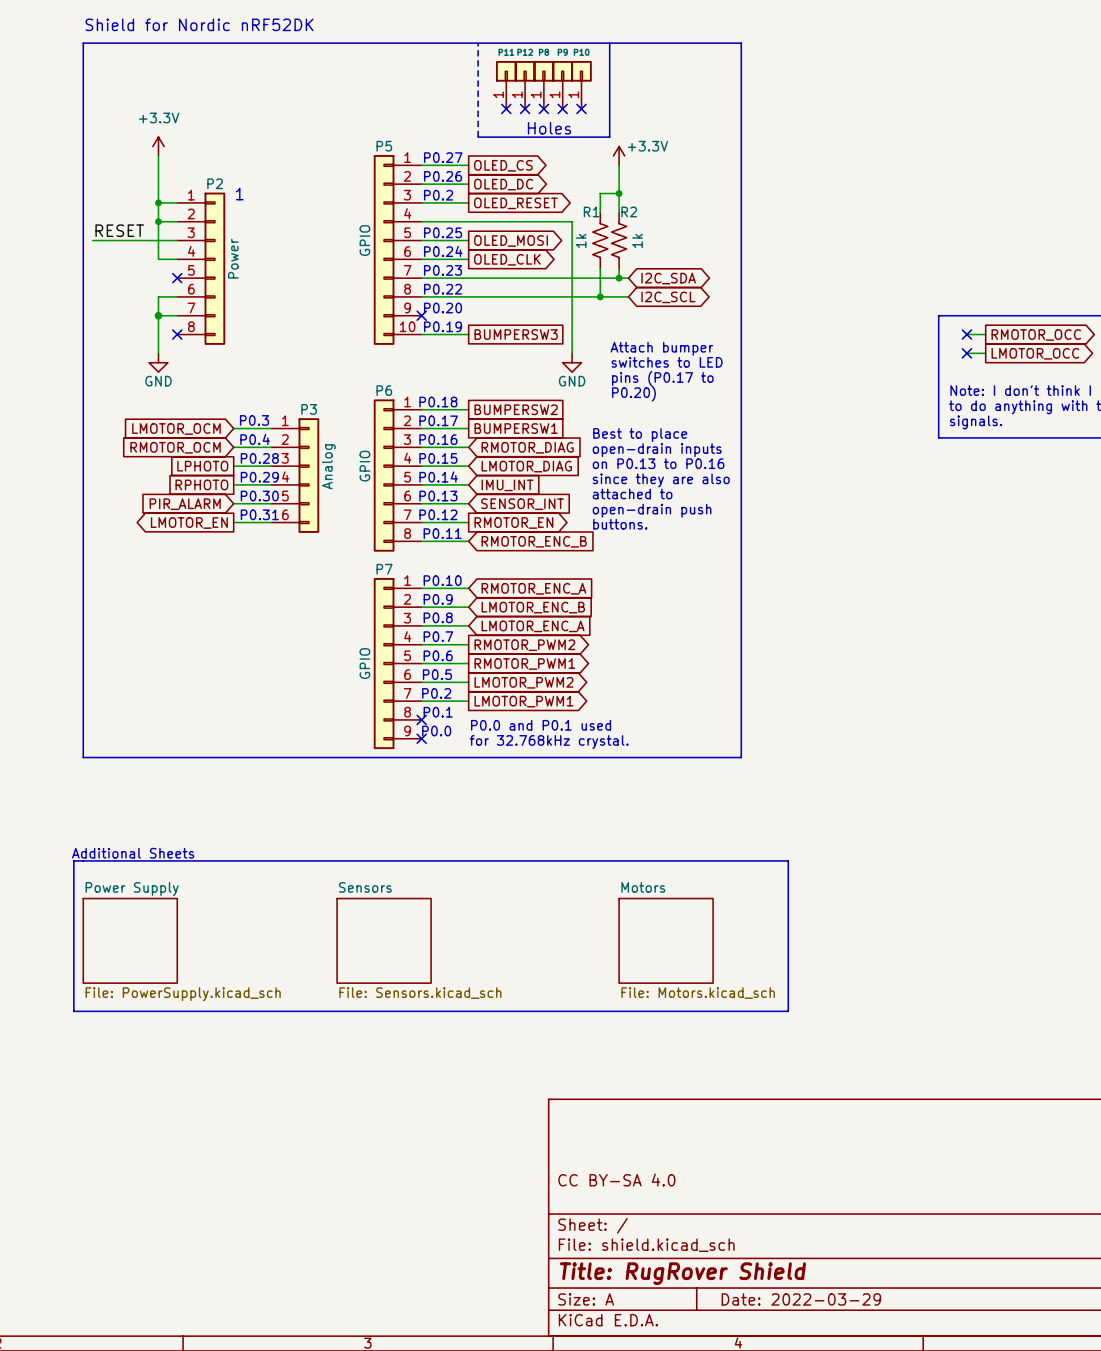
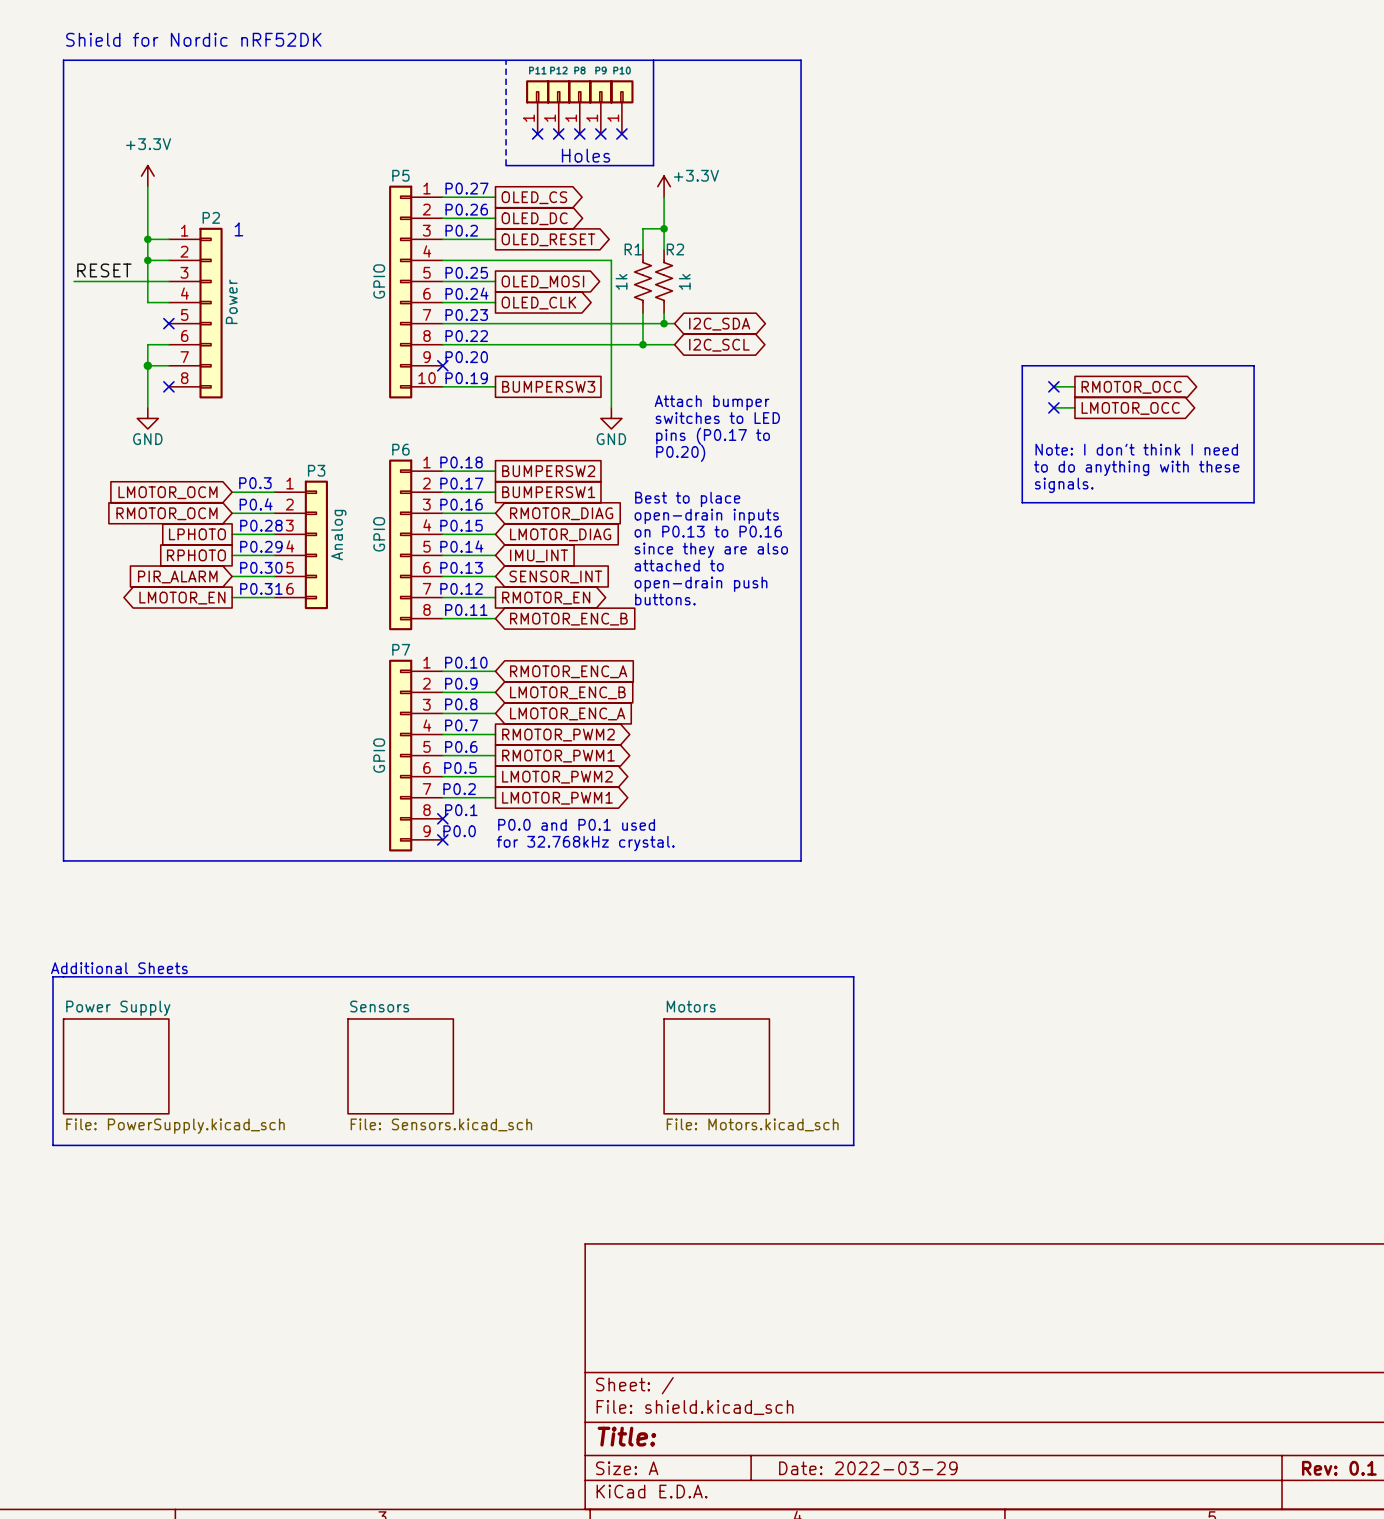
title block: CC BY-SA 4.0 (616, 1180) -> none
title block: Title: RugRover Shield (682, 1273) -> Title: (626, 1436)

